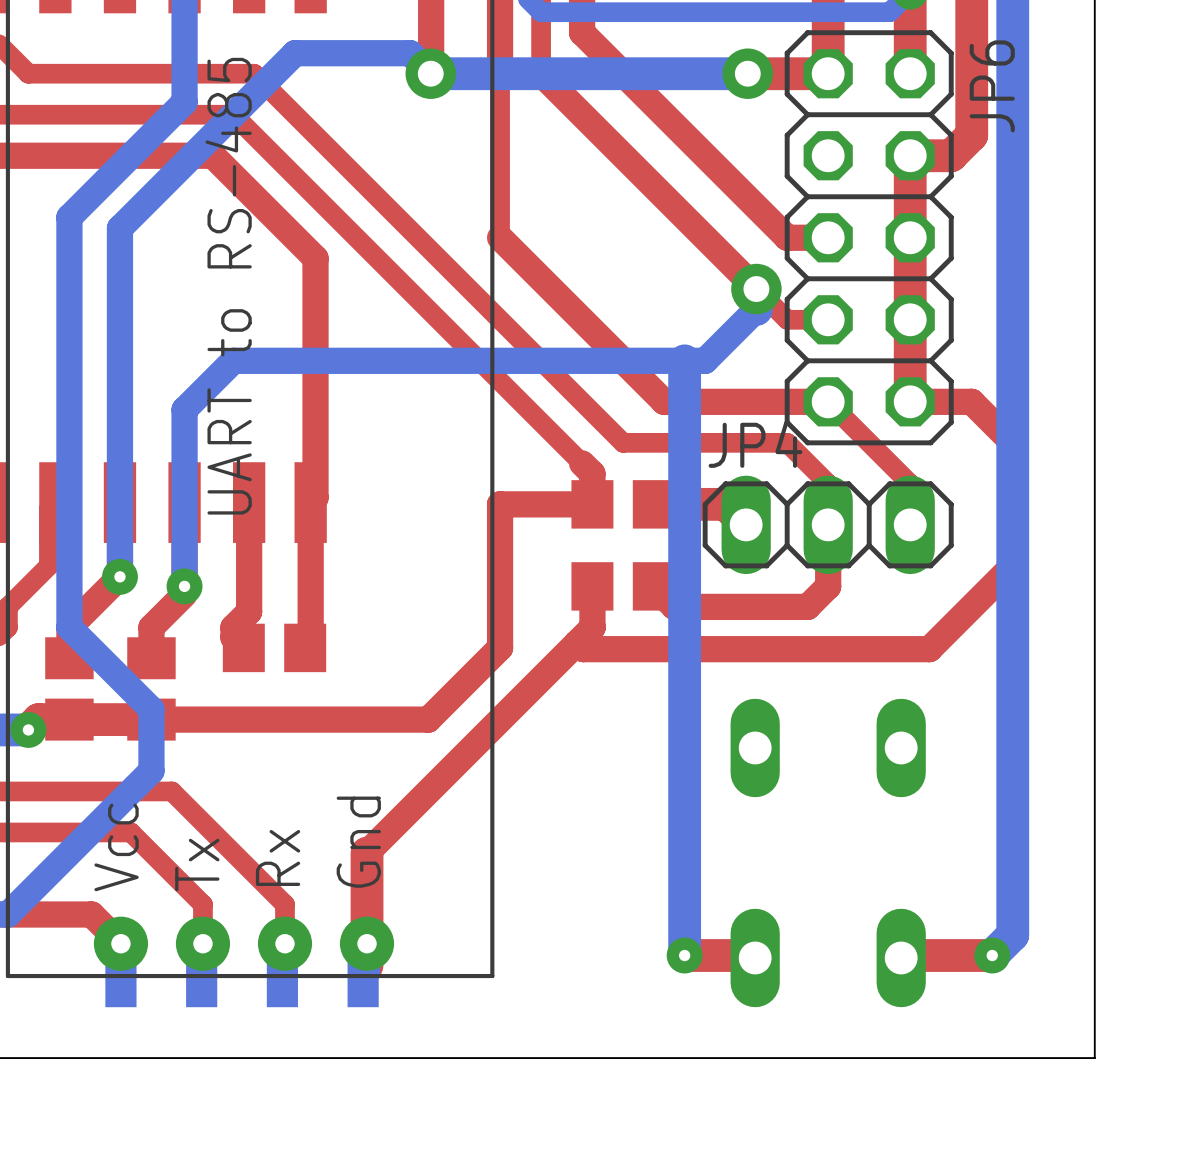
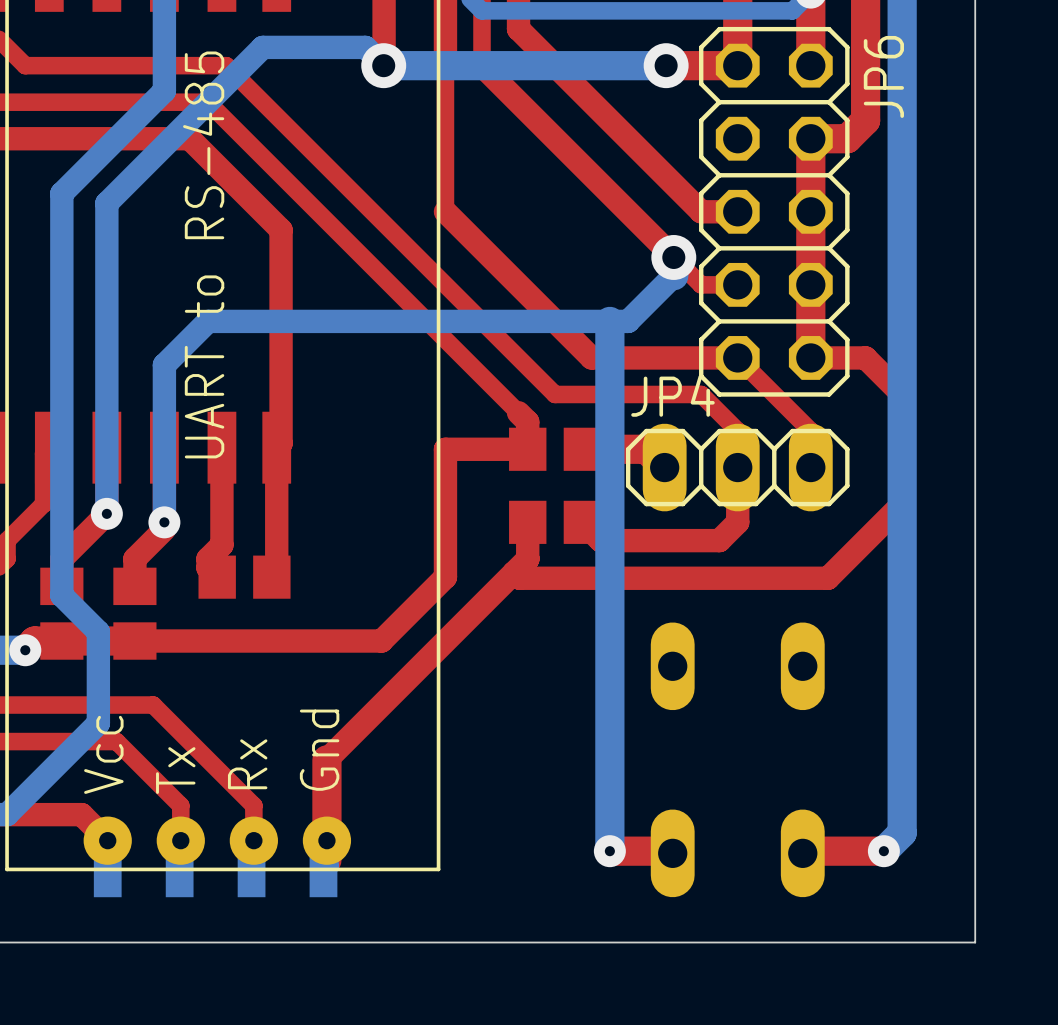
bottom track: (69, 627) (151, 709) (151, 770) (110, 811) -> (61, 558) (61, 595) (98, 631) (98, 723)

